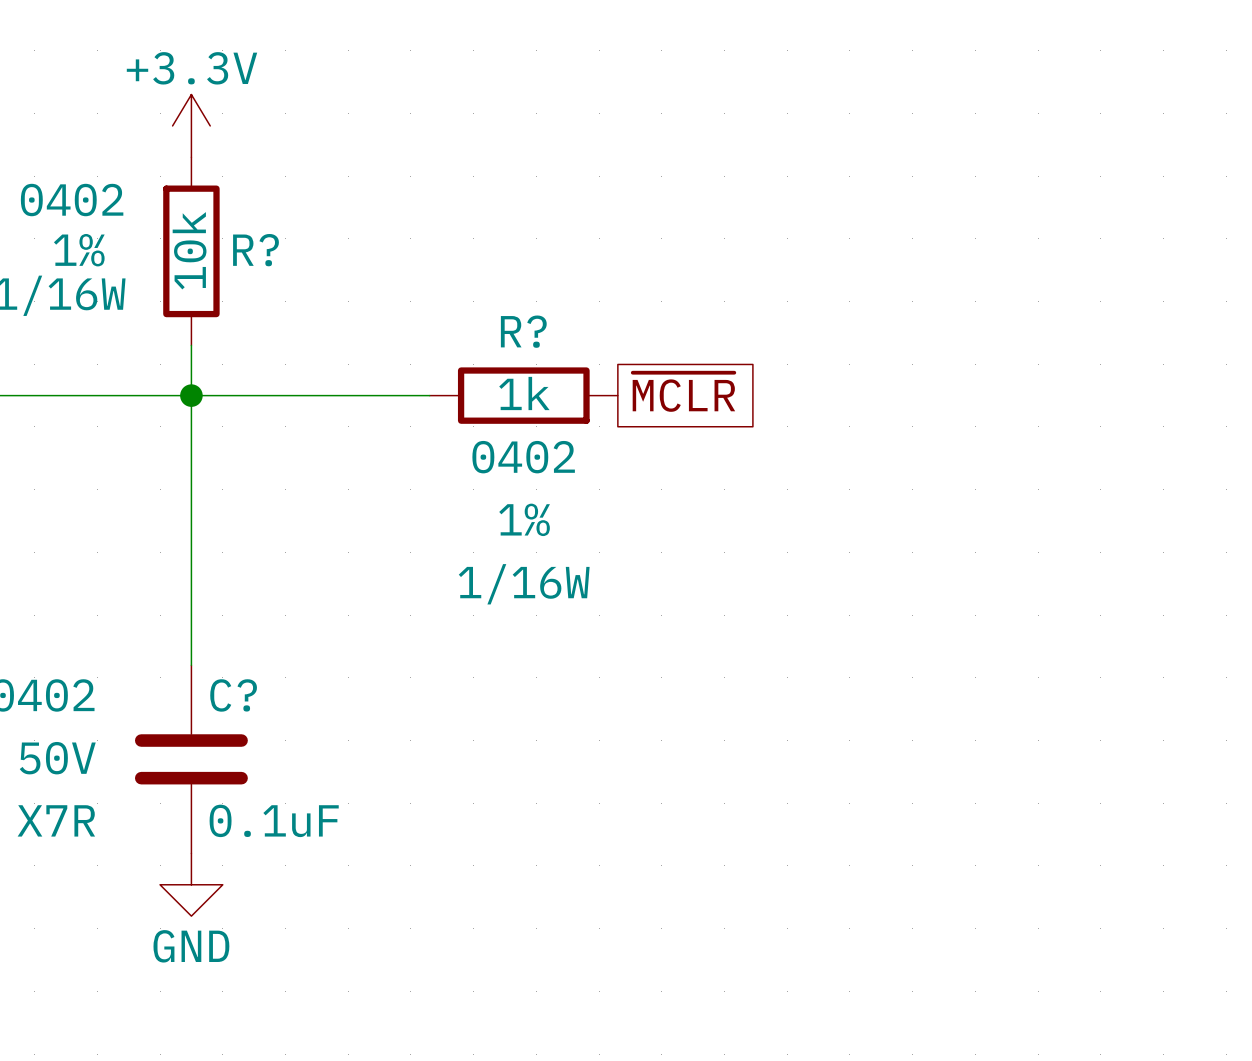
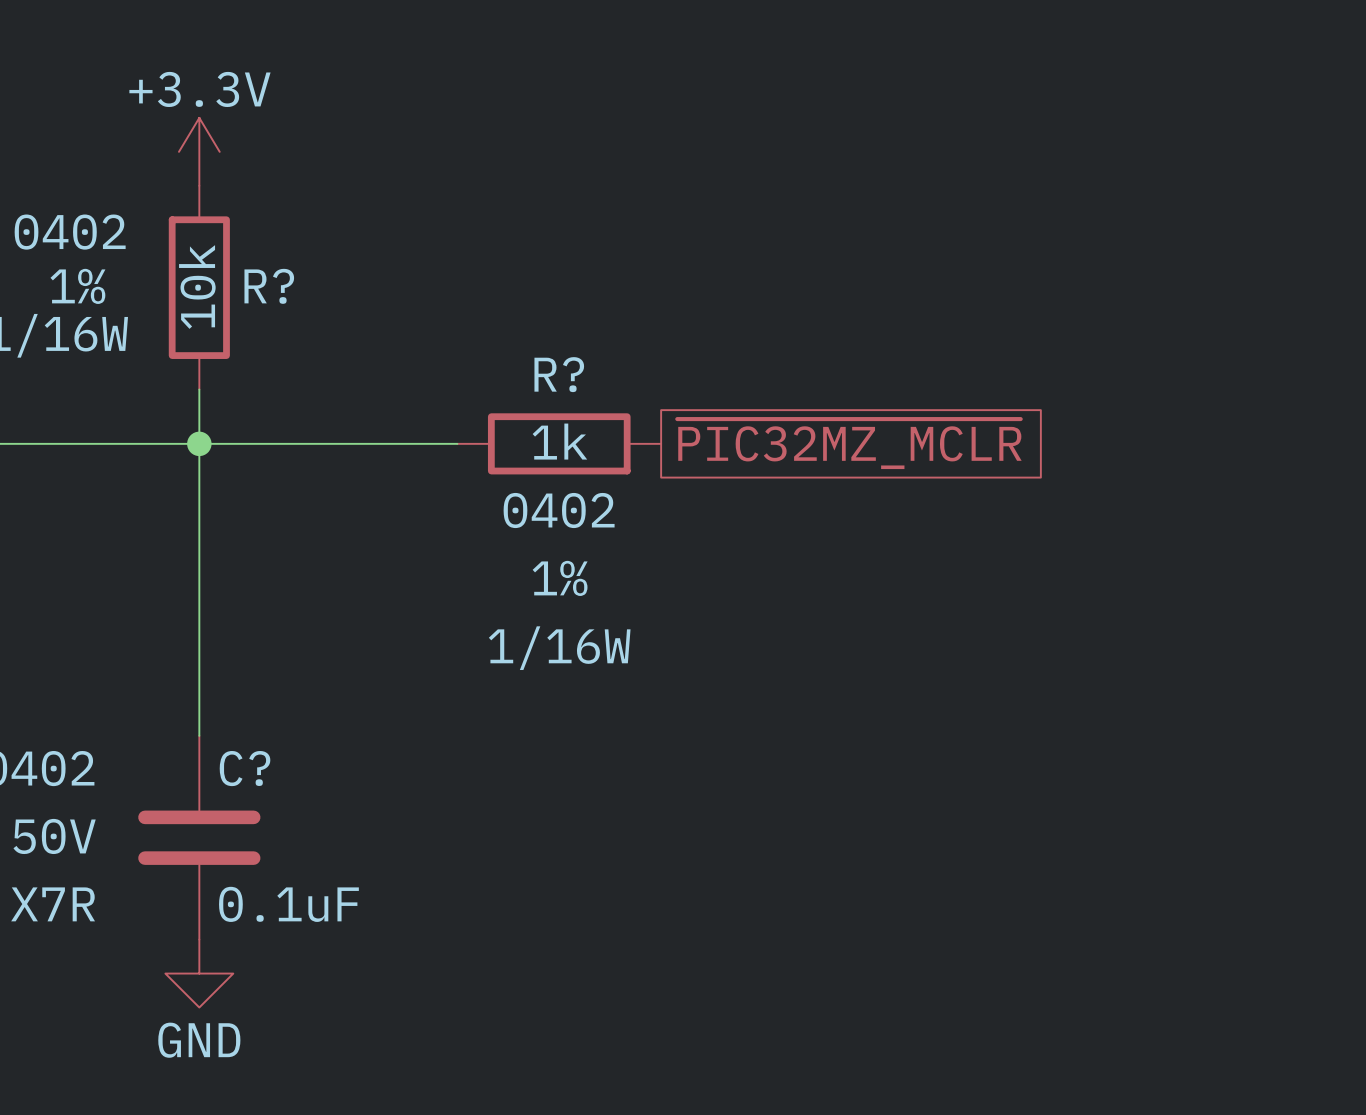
global label: ~{MCLR} (683, 392) -> ~{PIC32MZ_MCLR} (849, 444)

